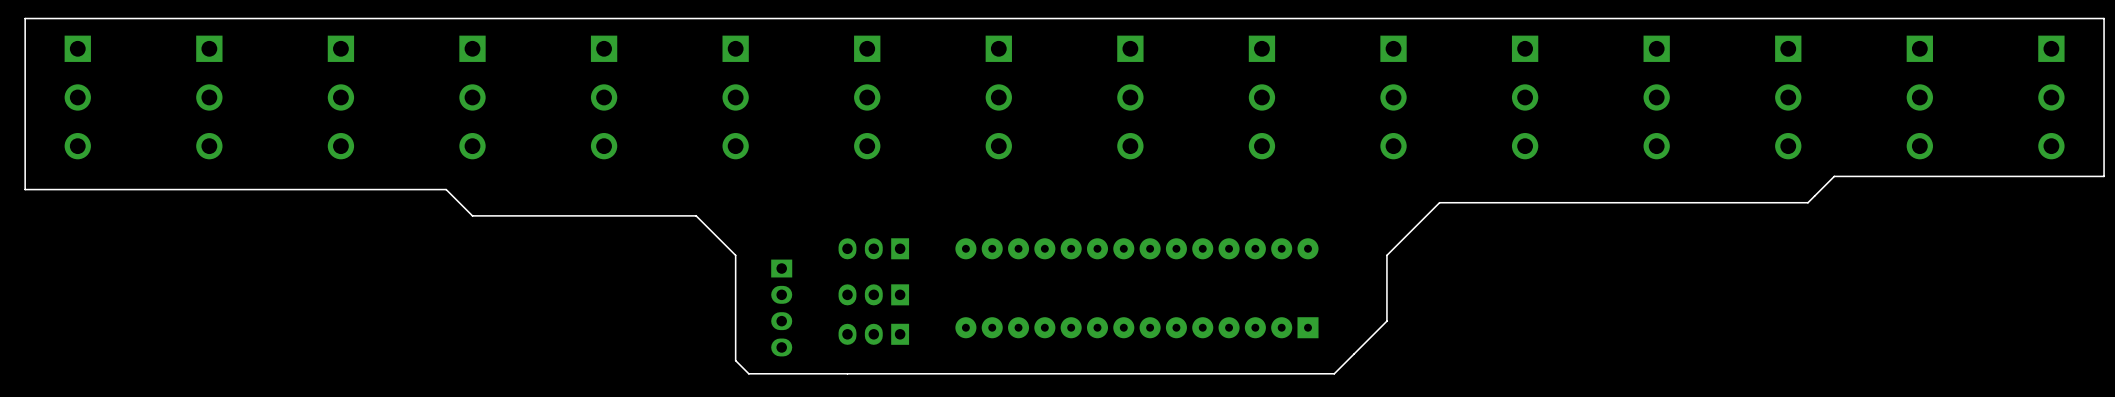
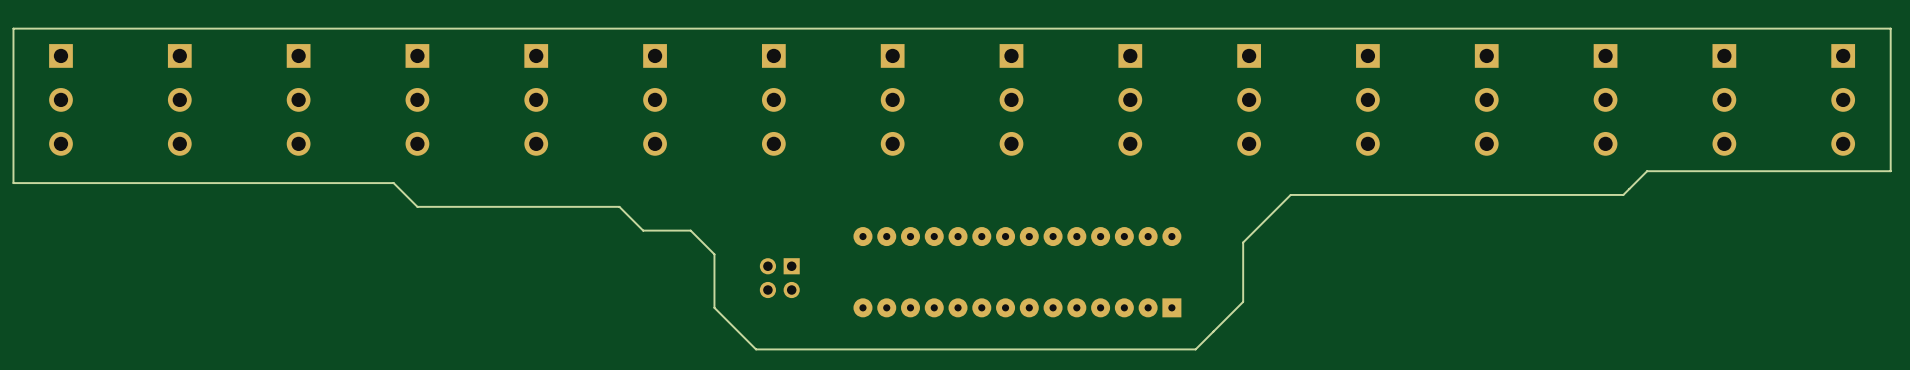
board edge: (722, 242) (735, 255) (735, 360) (748, 373) (847, 373) -> (643, 230) (690, 230) (714, 254) (714, 307) (756, 349)
part: (873, 248) -> none
part footprint: [838, 284, 910, 306] -> [759, 258, 800, 299]
part: (781, 307) -> none
part: (873, 334) -> none

